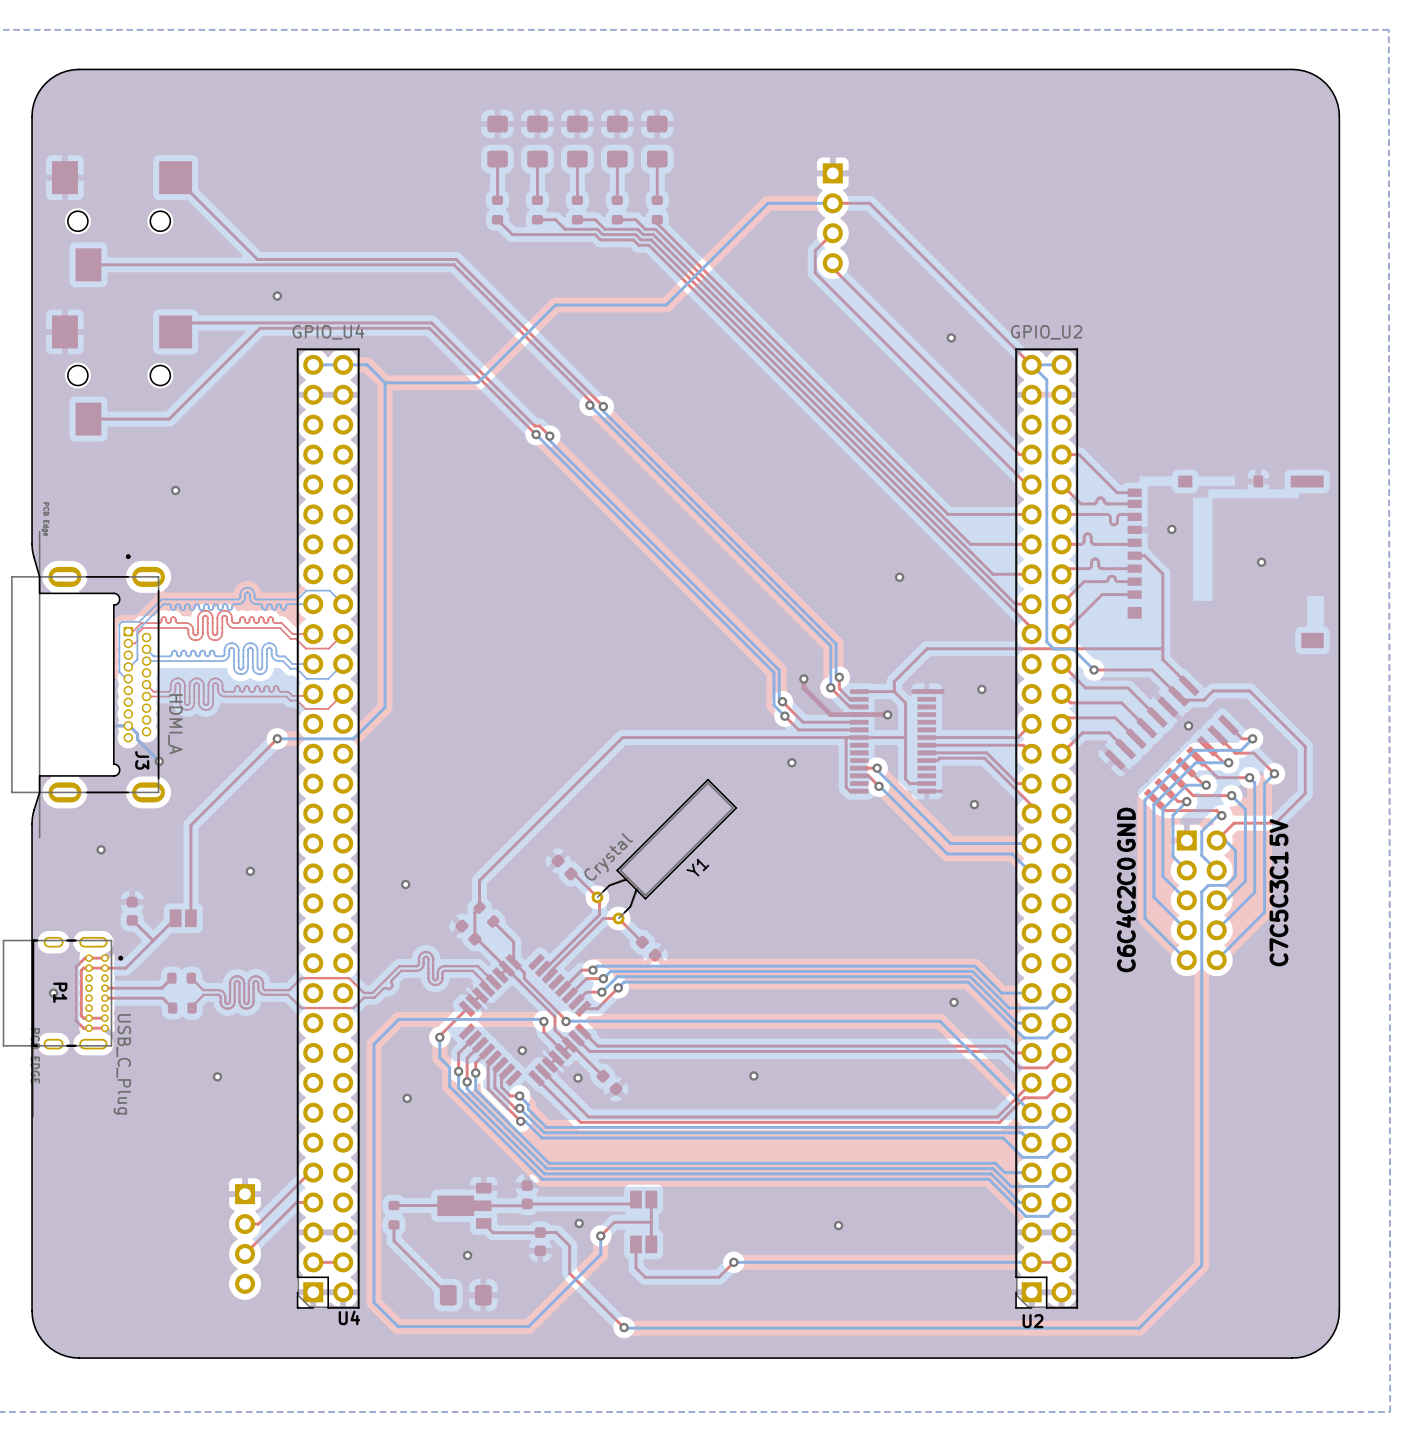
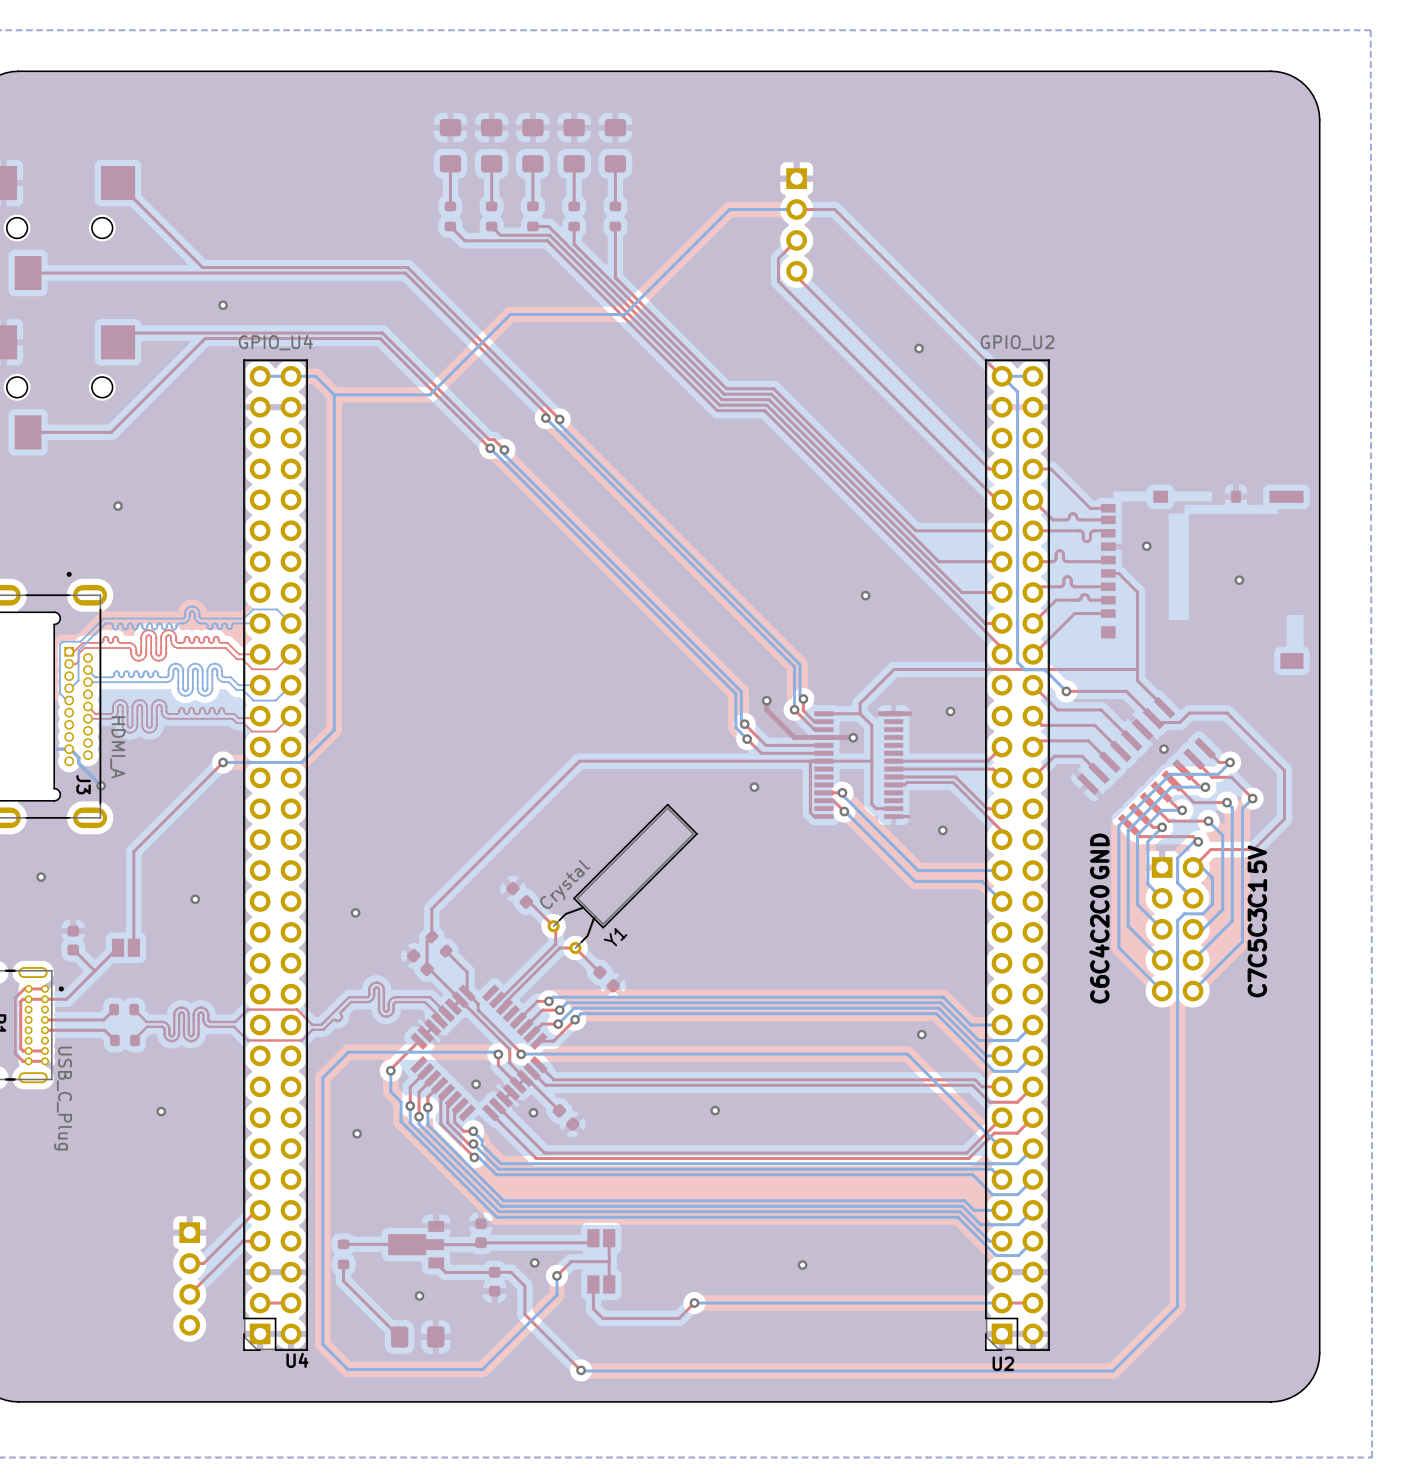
top track: (537, 219) (555, 219) (565, 229) (597, 229) (602, 234) (635, 234) (640, 239) (651, 239) (804, 392) -> (491, 226) (500, 235) (549, 235) (719, 405) (766, 405)
top track: (592, 219) (595, 219) (604, 229) (637, 229) (643, 234) (653, 234) (806, 387) -> (548, 226) (721, 399) (769, 399)
top track: (617, 219) (635, 219) (645, 229) (655, 229) (808, 382) -> (574, 226) (574, 244) (724, 394) (771, 394)
top track: (657, 223) (810, 376) -> (615, 230) (615, 277) (726, 388) (773, 388)
top track: (511, 233) (595, 234) (600, 239) (633, 239) (638, 245) (648, 245) (801, 398) -> (464, 240) (547, 240) (717, 410) (764, 410)
Y1 name position: Y1 (697, 867) -> Y1 (615, 937)

